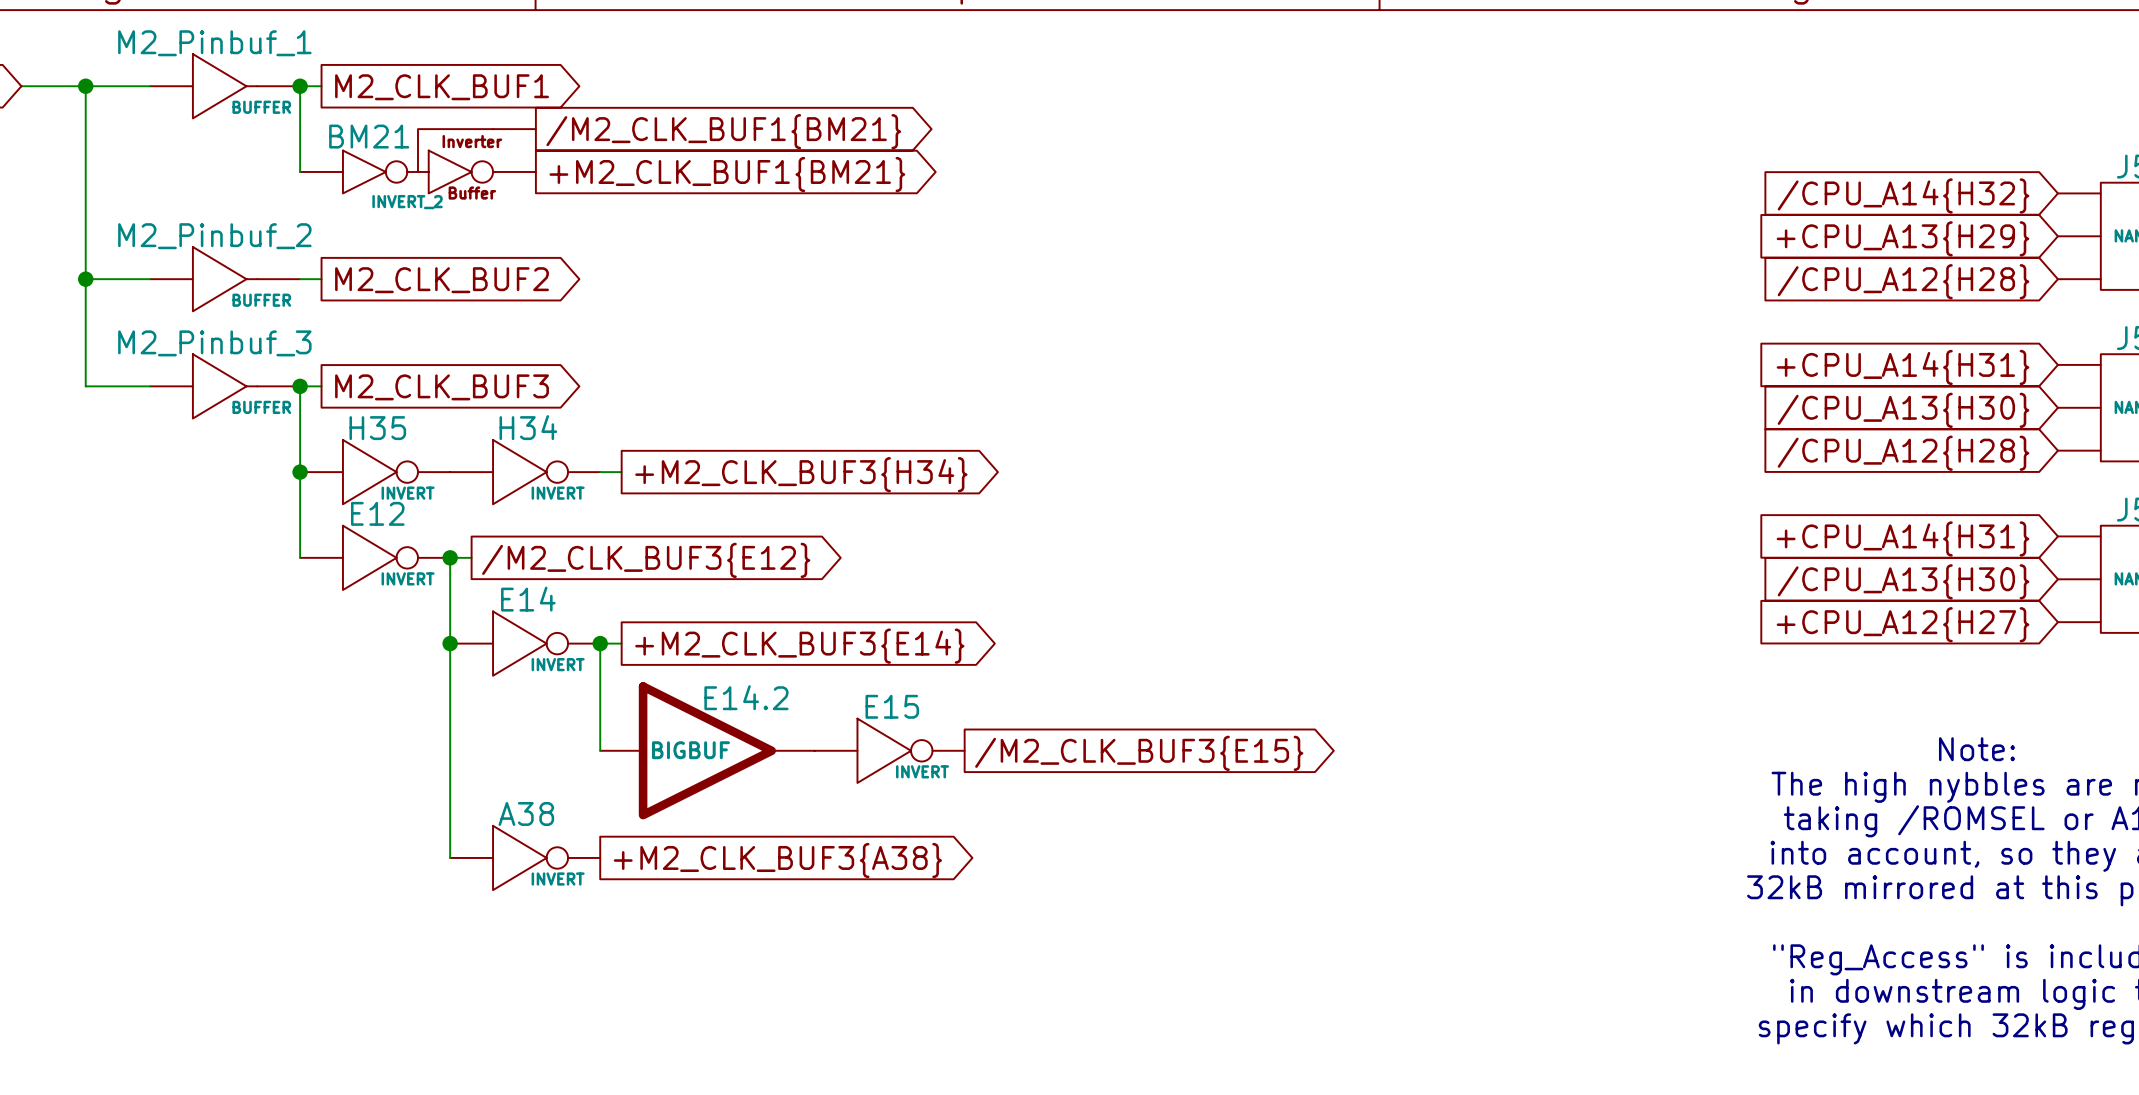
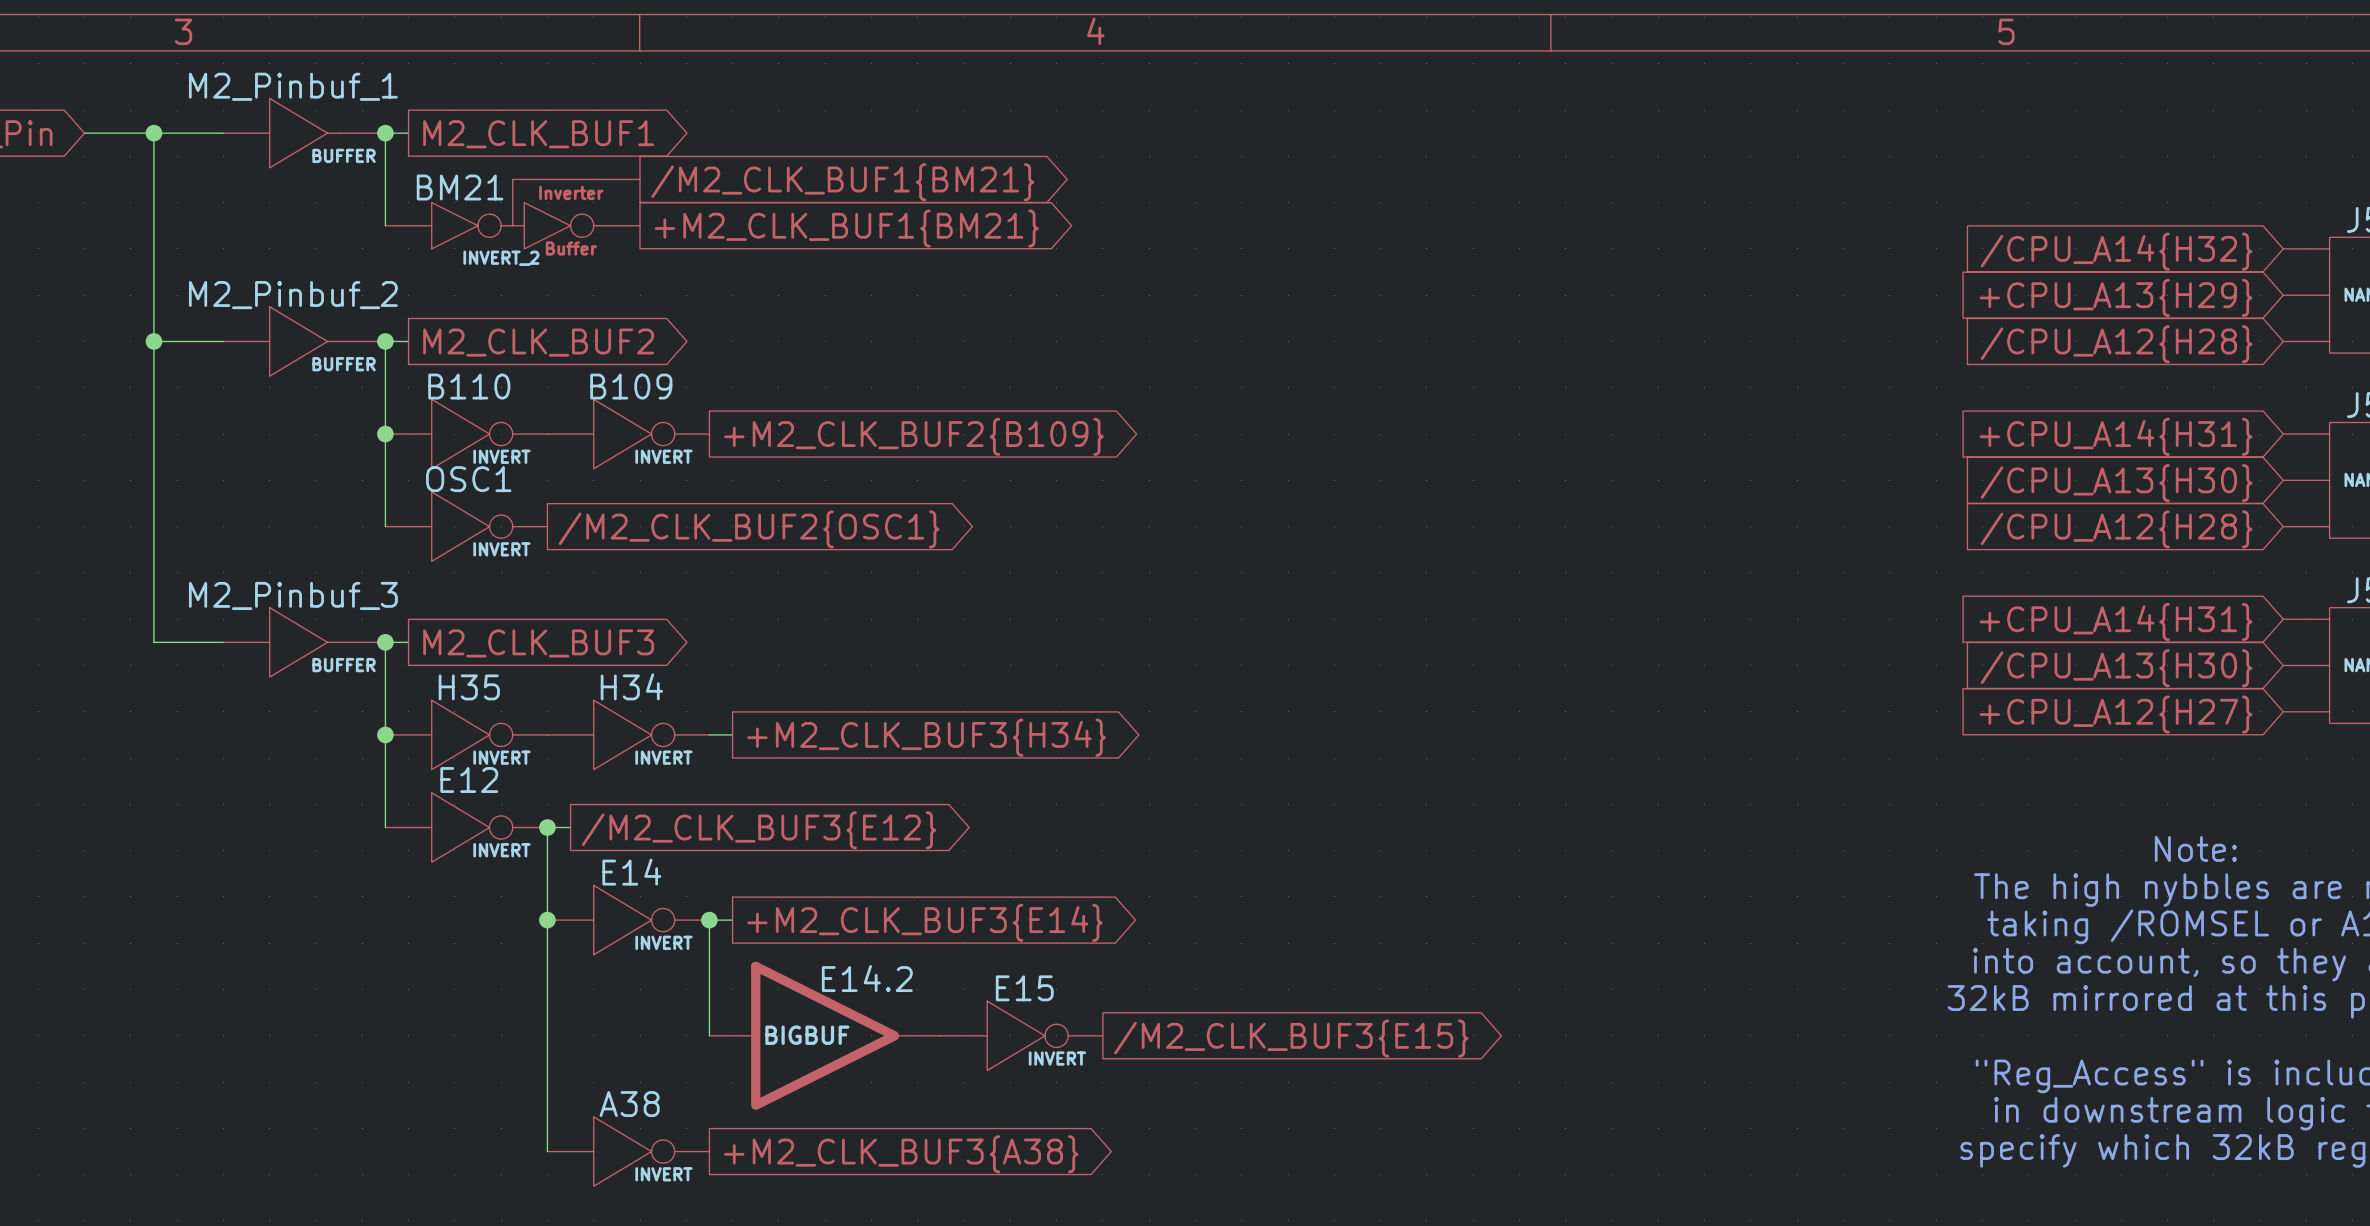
junction: none -> (385, 341)
B110: none -> INVERT (466, 434)
B109: none -> INVERT (628, 434)
global label: none -> +M2_CLK_BUF2{B109} (913, 436)
wire: (85, 386) (150, 386) -> (153, 457) (153, 642) (223, 642)
M2_Pinbuf_3 position: (225, 386) -> (304, 642)
wire: (300, 386) (321, 386) -> (385, 457) (385, 341)
junction position: (300, 386) -> (385, 434)
global label position: M2_CLK_BUF3 (442, 387) -> M2_CLK_BUF3 (538, 643)
wire: (300, 450) (300, 557) -> none
OSC1: none -> INVERT (466, 526)
junction: (300, 472) -> none
H35 position: (375, 472) -> (466, 734)
H34: INVERT (525, 472) -> none
global label: +M2_CLK_BUF3{H34} (801, 474) -> /M2_CLK_BUF2{OSC1} (749, 529)
junction: none -> (385, 642)
wire: none -> (408, 642) (385, 642) (385, 827)
E12 position: (375, 557) -> (466, 827)
junction: (450, 557) -> none
wire: (471, 557) (450, 557) (450, 729) -> (570, 827) (547, 827)
global label position: /M2_CLK_BUF3{E12} (646, 560) -> /M2_CLK_BUF3{E12} (759, 830)
E14 name: E14 (528, 599) -> H34 (631, 686)
junction: none -> (385, 734)
junction: (450, 643) -> none
wire: (600, 643) (600, 750) -> none
junction: (600, 643) -> none
global label: +M2_CLK_BUF3{E14} (799, 646) -> +M2_CLK_BUF3{H34} (926, 737)
junction: none -> (547, 827)
E14.2 position: (707, 750) -> (825, 1035)
E15 position: (889, 750) -> (1021, 1035)
global label position: /M2_CLK_BUF3{E15} (1139, 753) -> /M2_CLK_BUF3{E15} (1291, 1038)
junction: none -> (547, 920)
E14: none -> INVERT (628, 920)
junction: none -> (709, 920)
wire: none -> (732, 920) (709, 920) (709, 1035)
global label: none -> +M2_CLK_BUF3{E14} (924, 922)
wire: none -> (547, 966) (547, 1151)
A38 position: (525, 857) -> (628, 1151)
global label position: +M2_CLK_BUF3{A38} (777, 860) -> +M2_CLK_BUF3{A38} (901, 1154)

